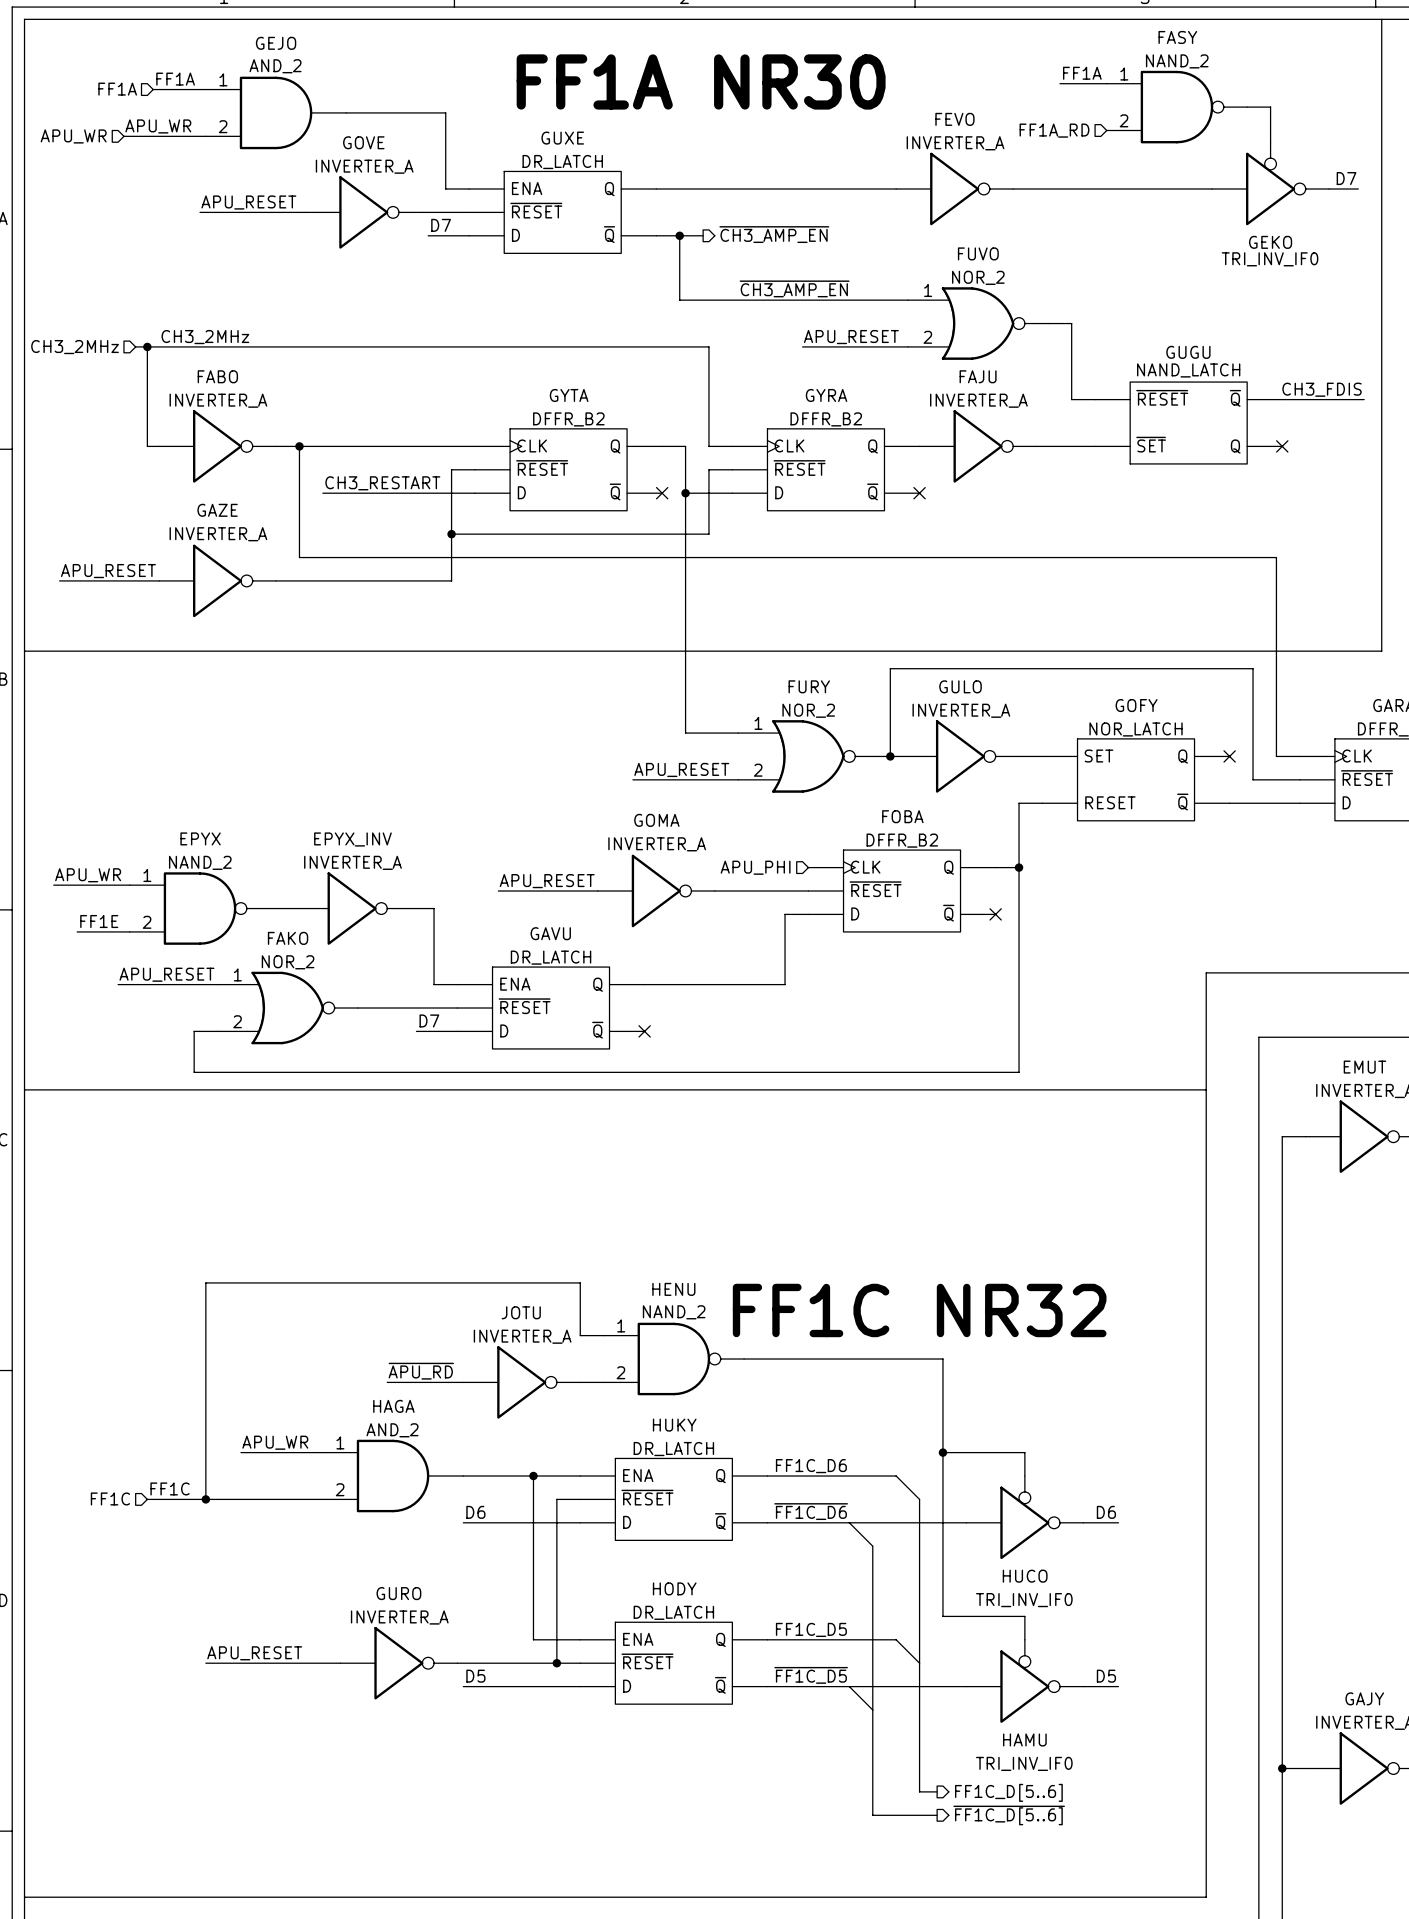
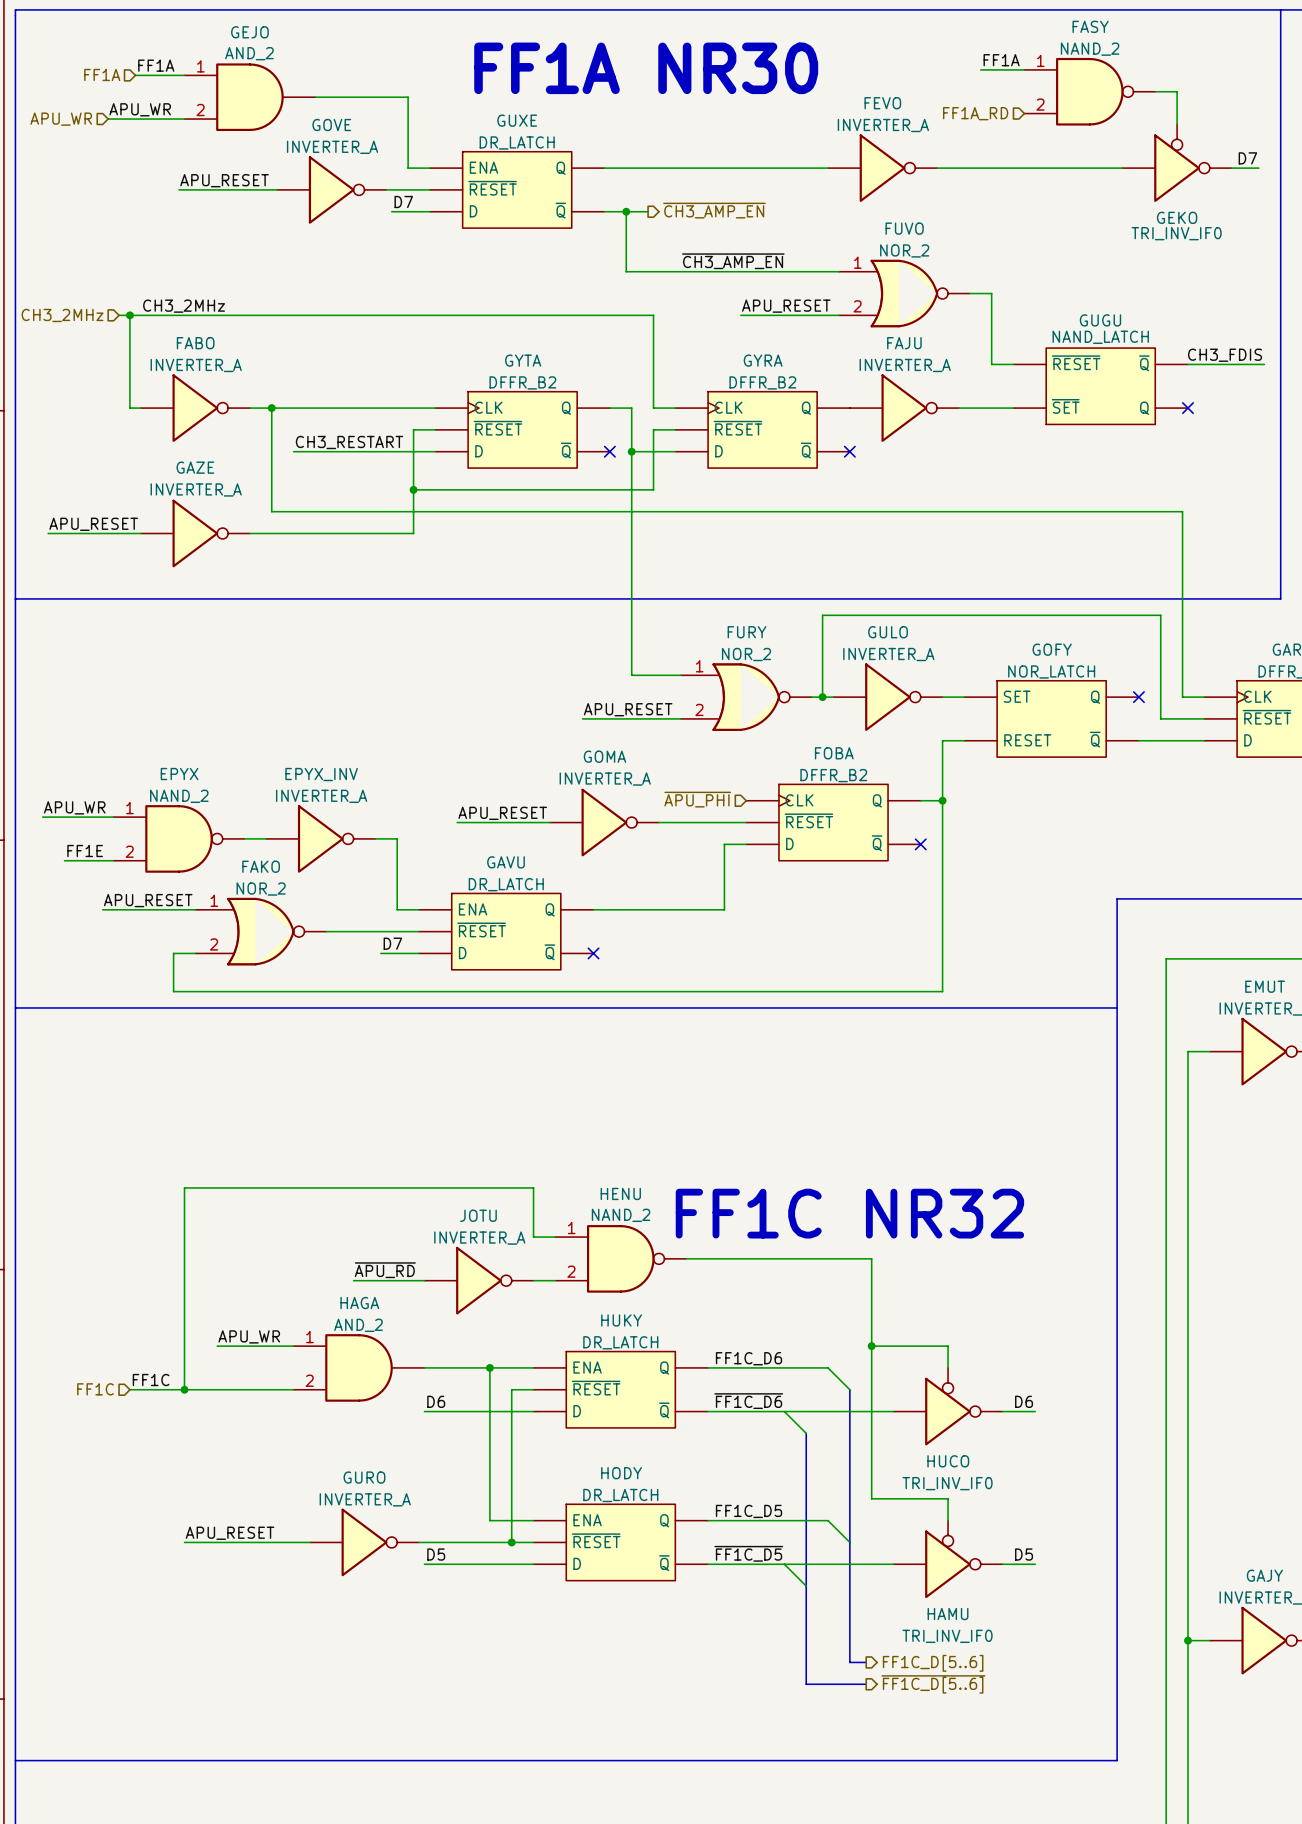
hierarchical label: APU_PHI (755, 867) -> ~{APU_PHI} (697, 799)

